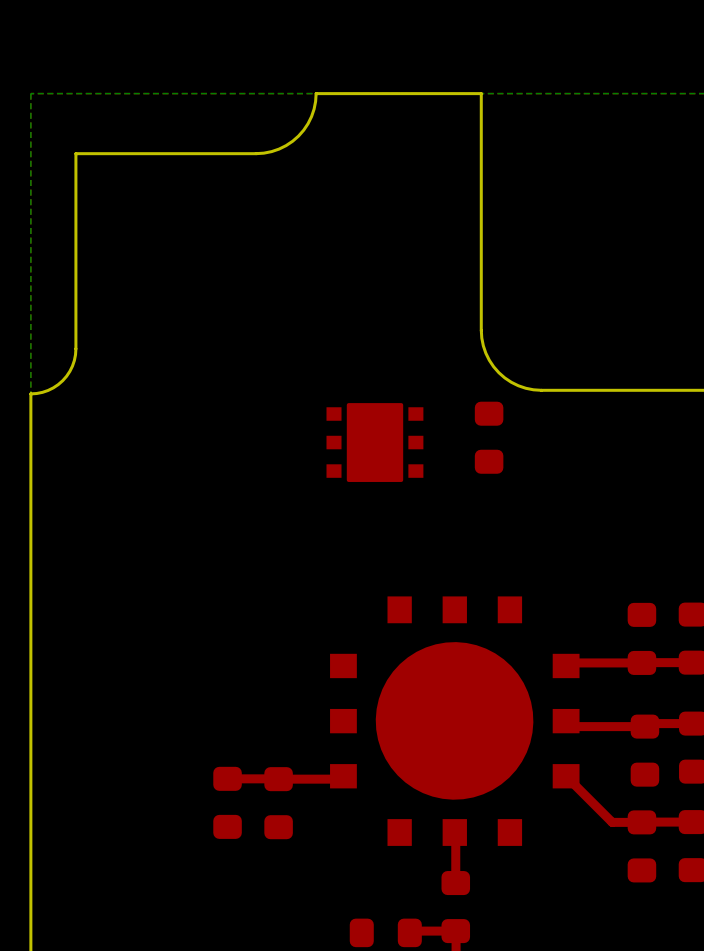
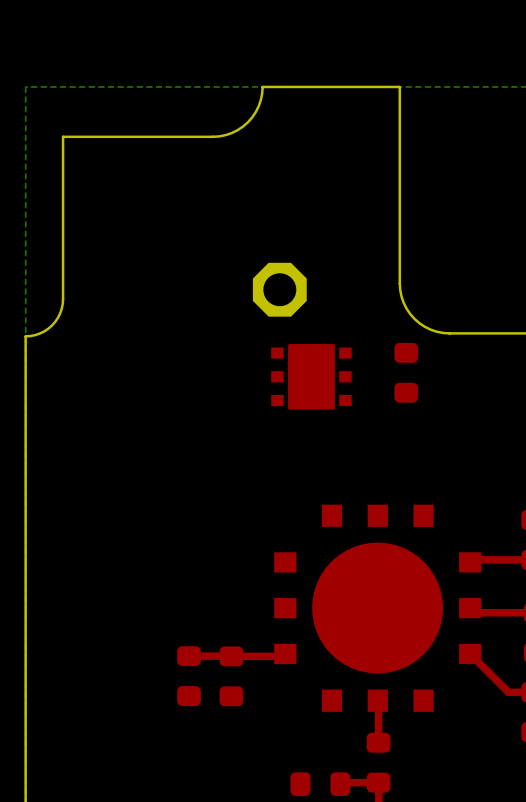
part: none -> (279, 289)

